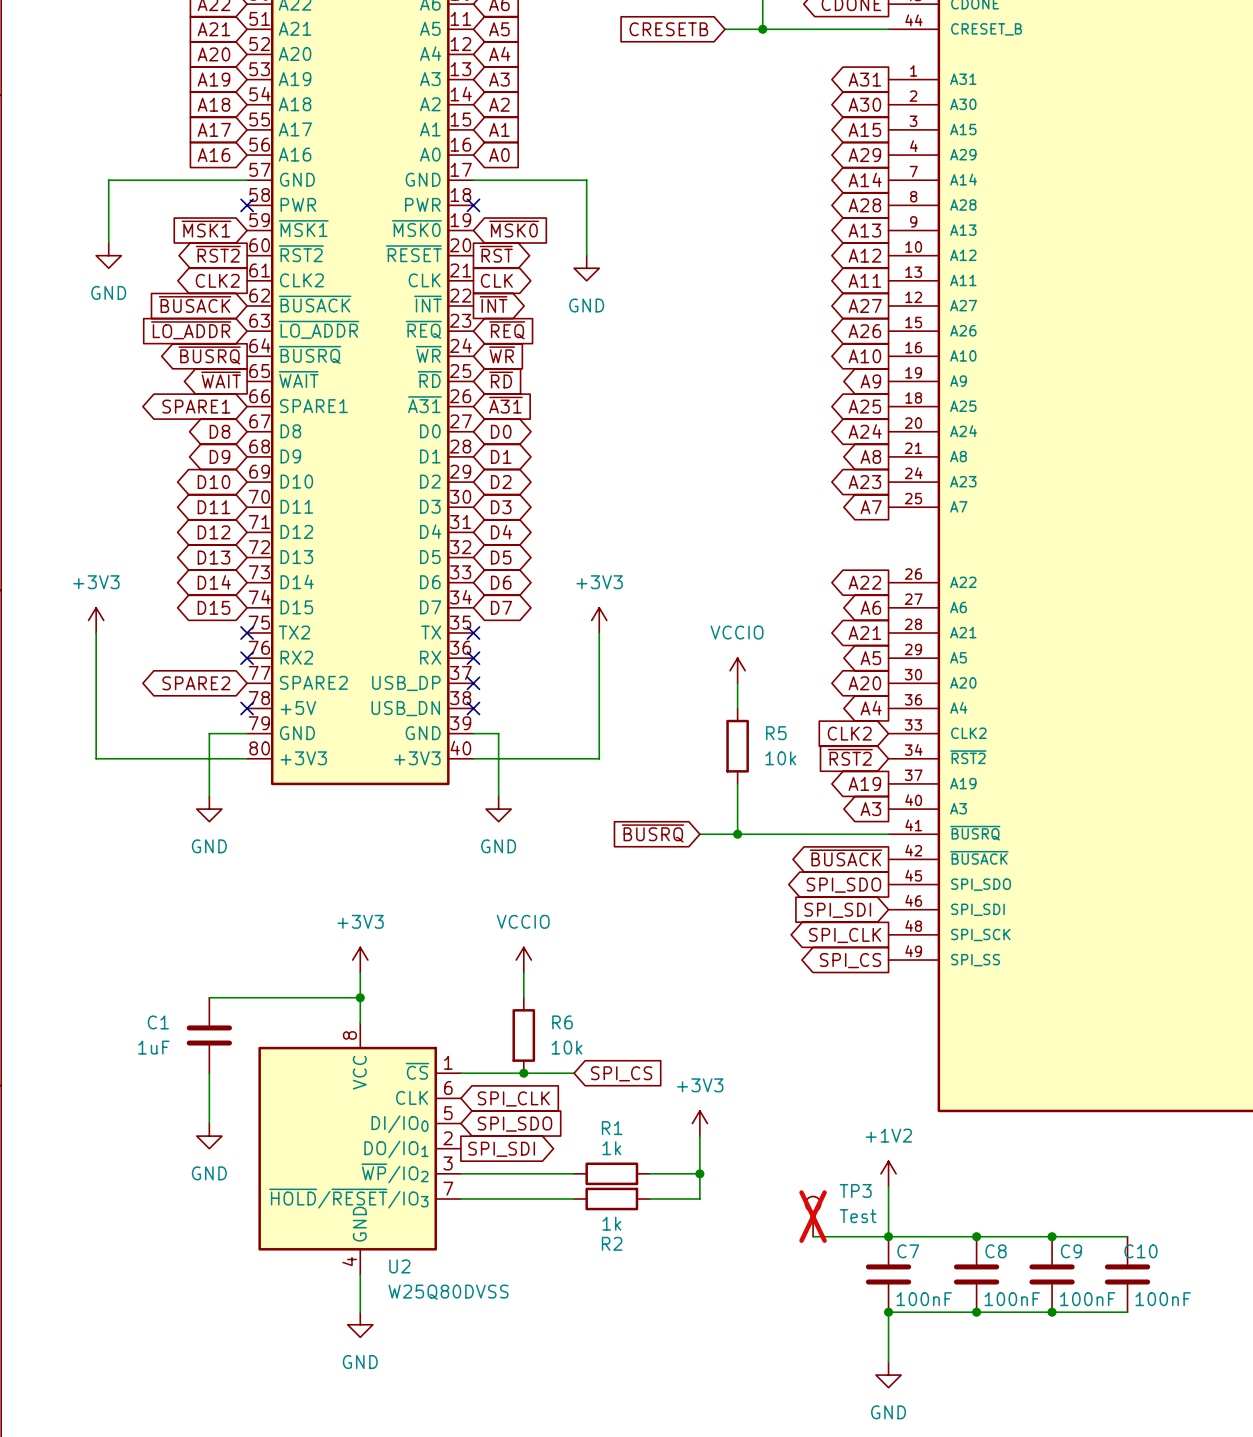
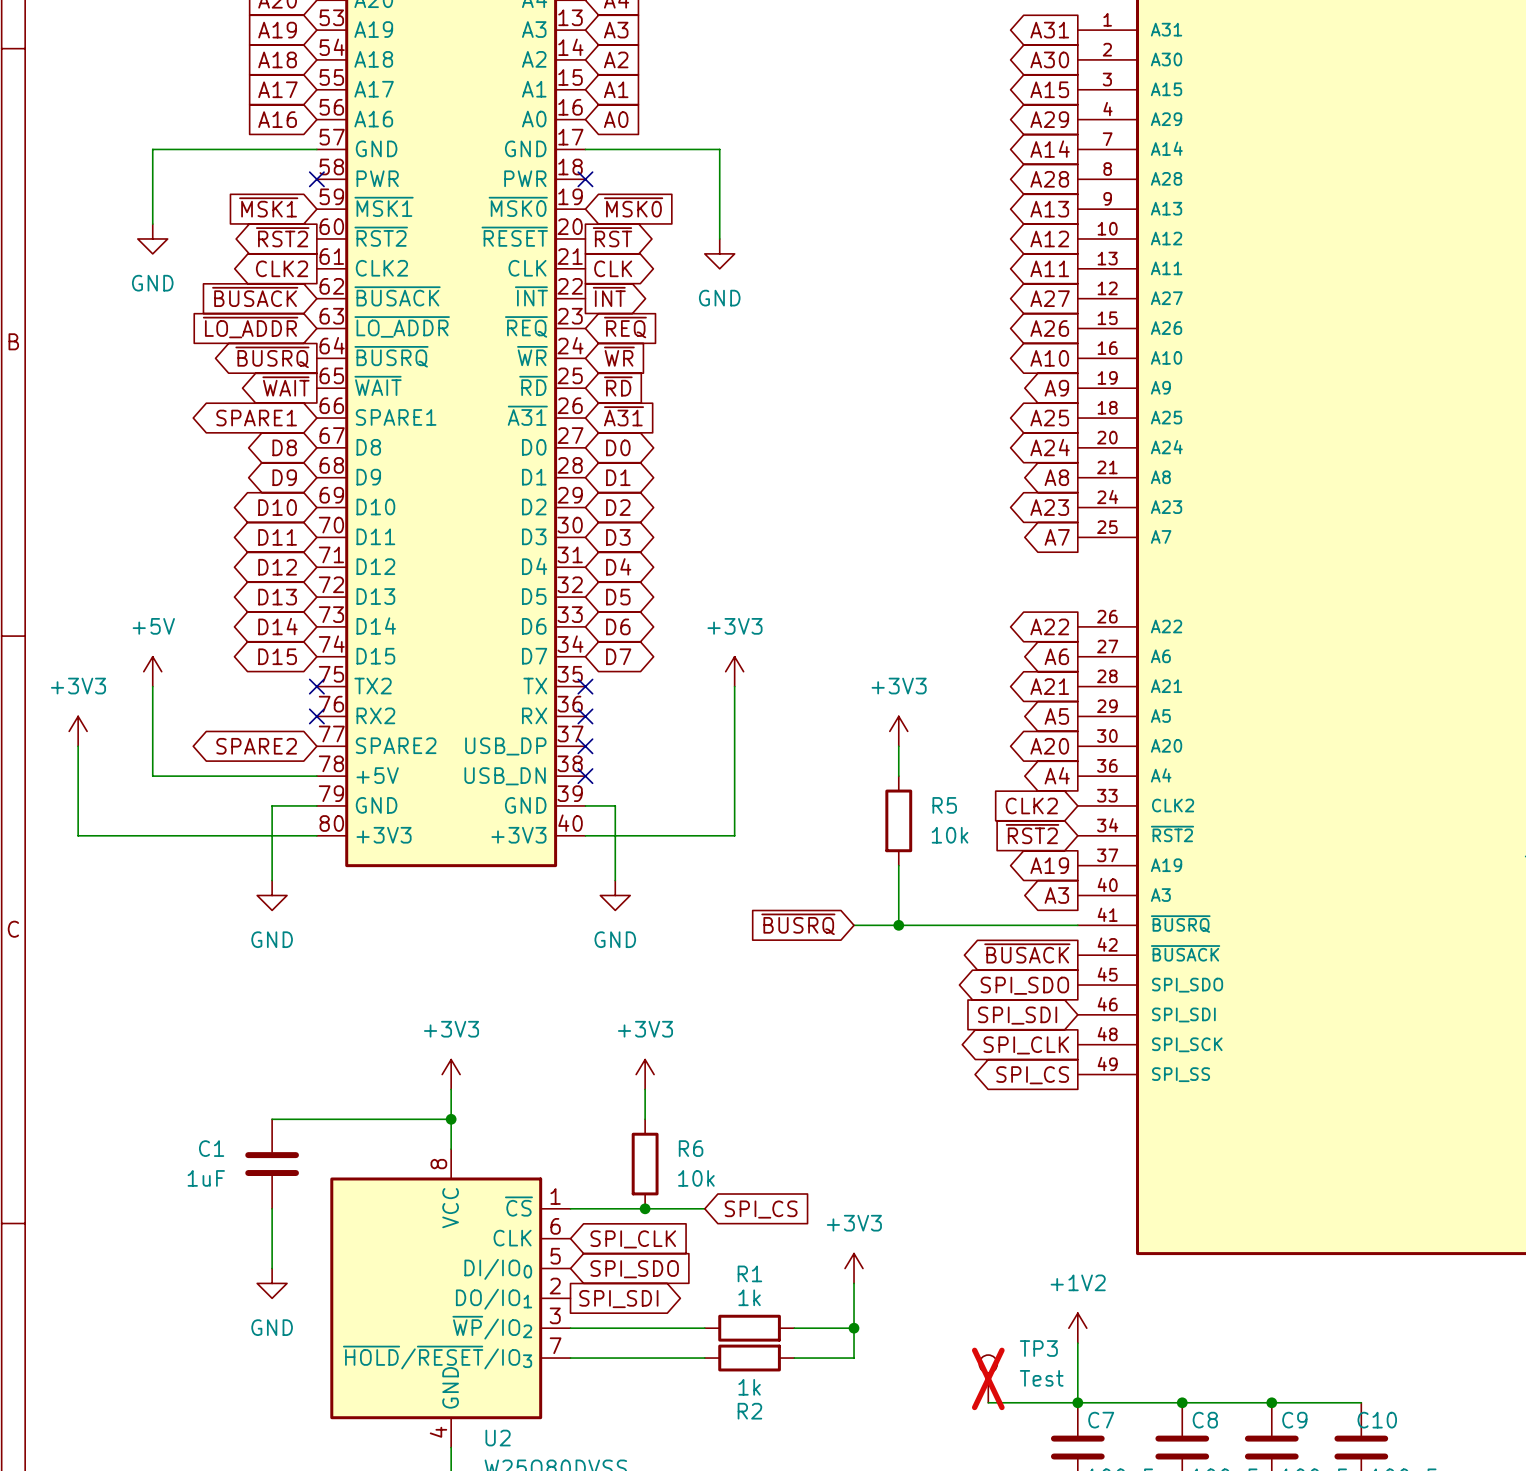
power symbol position: +3V3 (96, 620) -> +3V3 (78, 731)
power symbol: none -> +5V (152, 671)
wire: (96, 633) (96, 758) -> (78, 746) (78, 835) (137, 835)
wire: none -> (152, 686) (152, 776) (316, 776)
power symbol: VCCIO (737, 670) -> +3V3 (898, 731)
no-connect mark: (247, 708) -> none
power symbol: VCCIO (523, 960) -> +3V3 (645, 1074)

